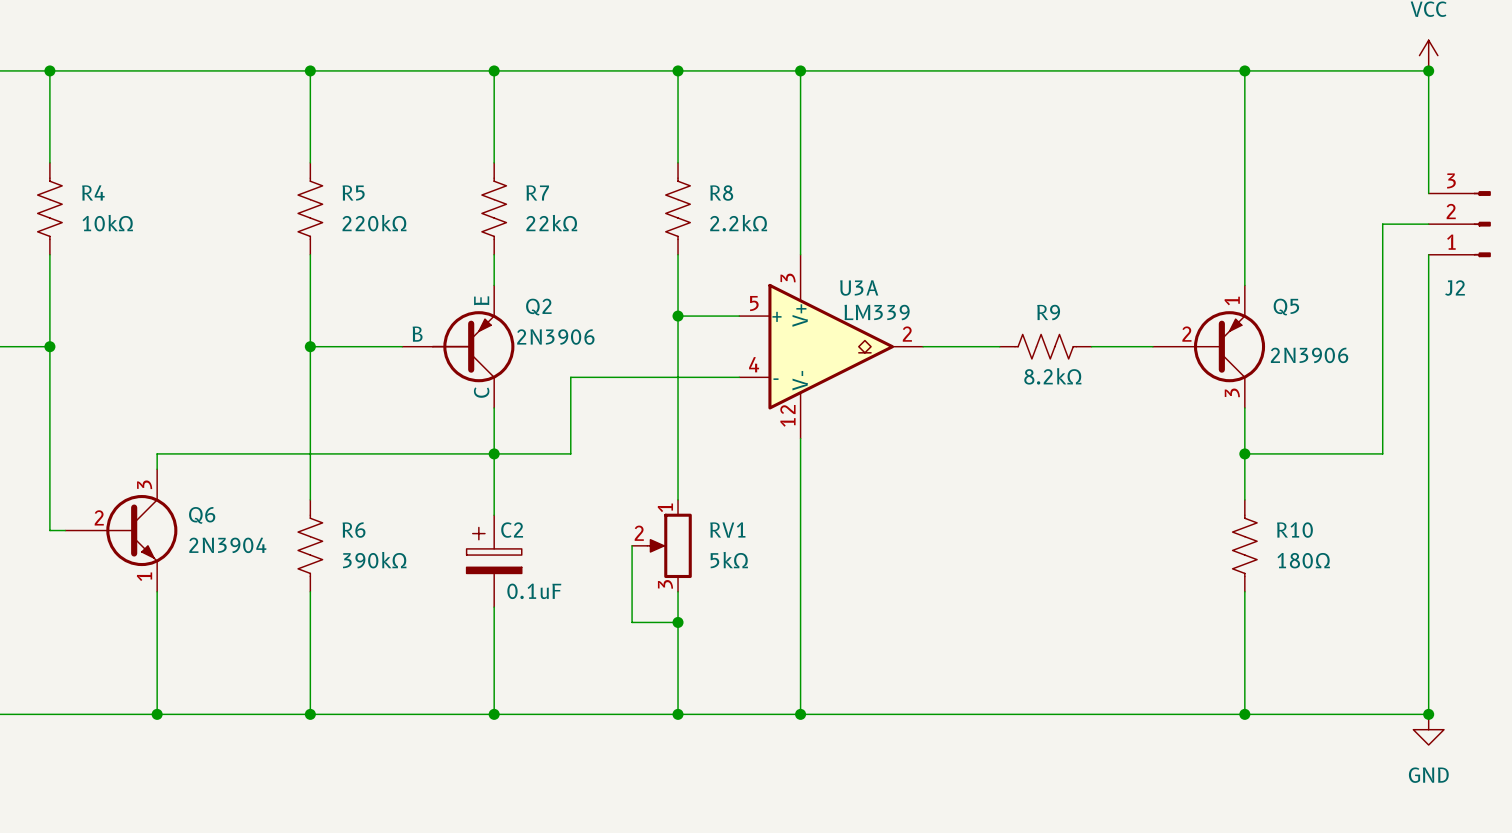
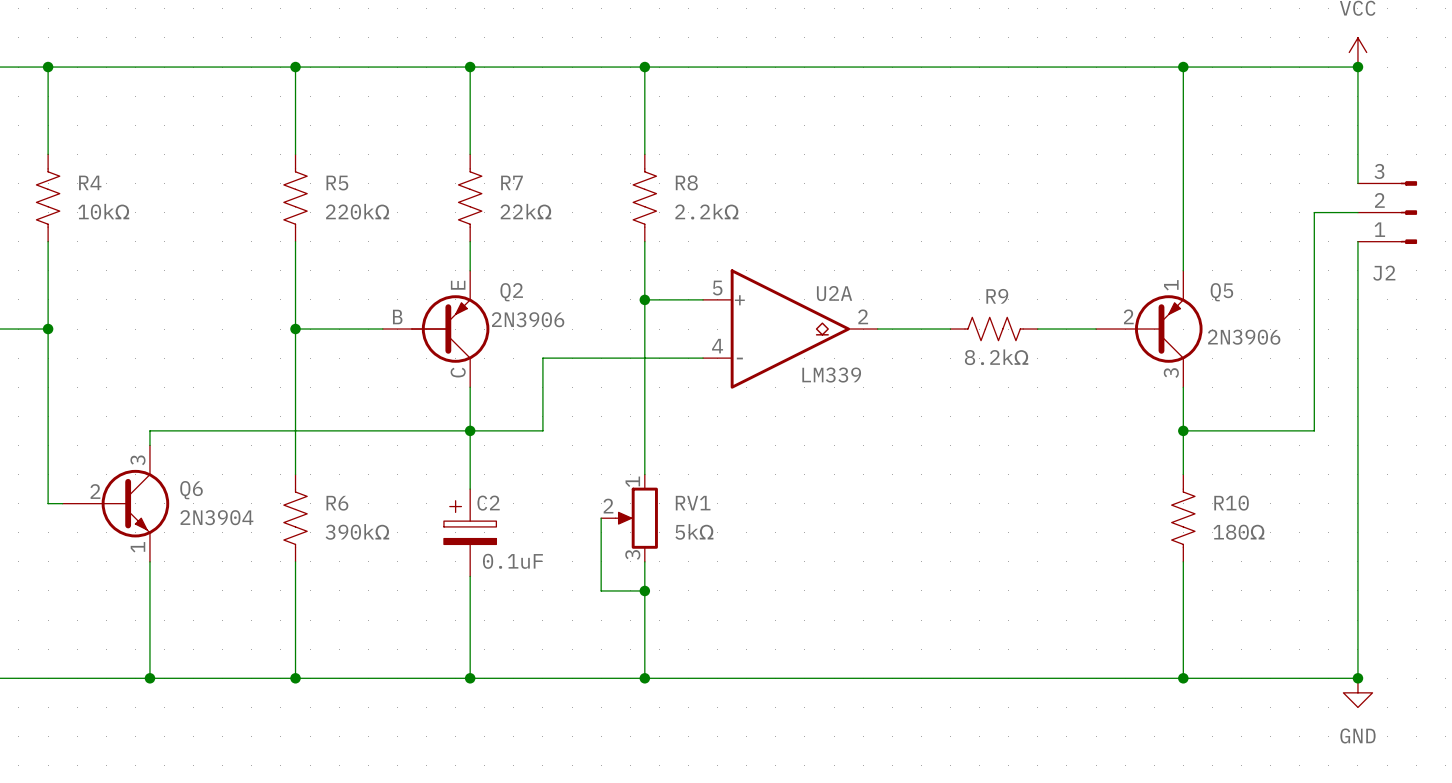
wire: (800, 70) (800, 254) -> none
junction: (800, 70) -> none
U3A name: U3A (859, 287) -> U2A (834, 293)
U3A value position: LM339 (877, 312) -> LM339 (831, 375)
part: (800, 346) -> none
wire: (800, 438) (800, 714) -> none
junction: (800, 714) -> none

